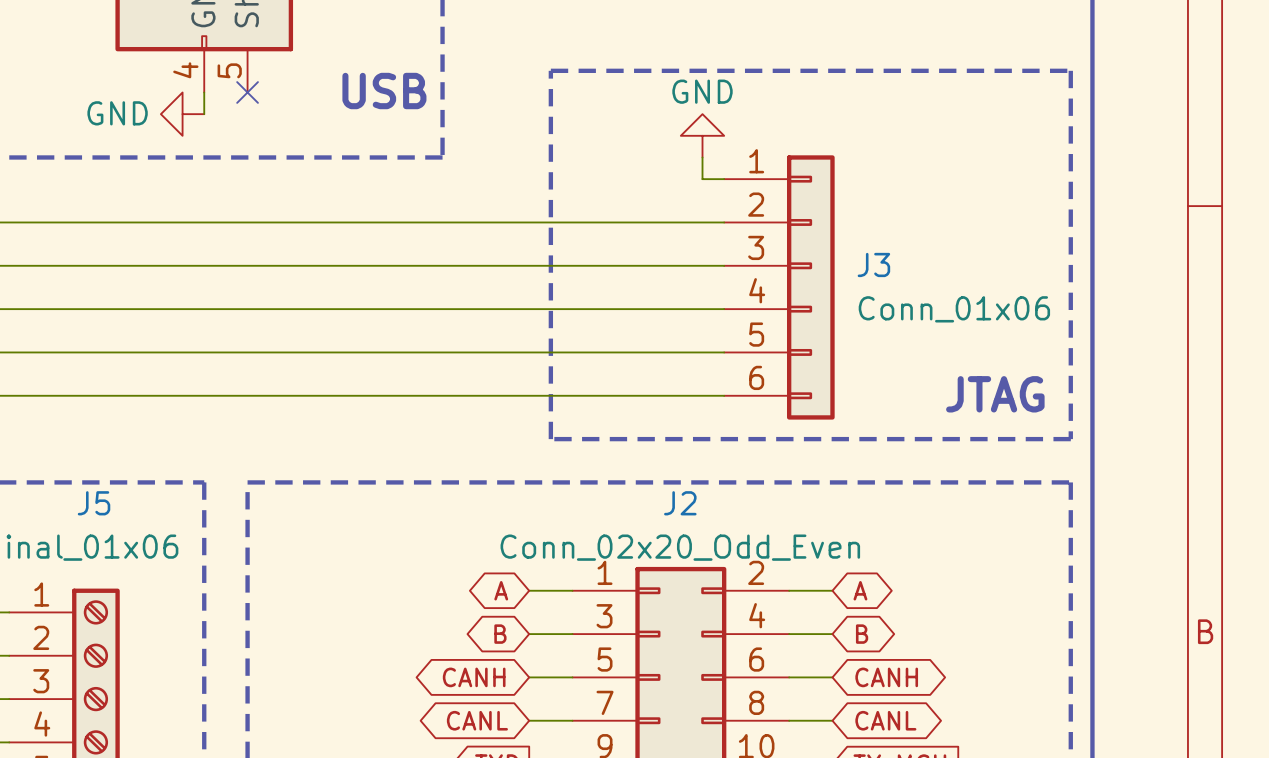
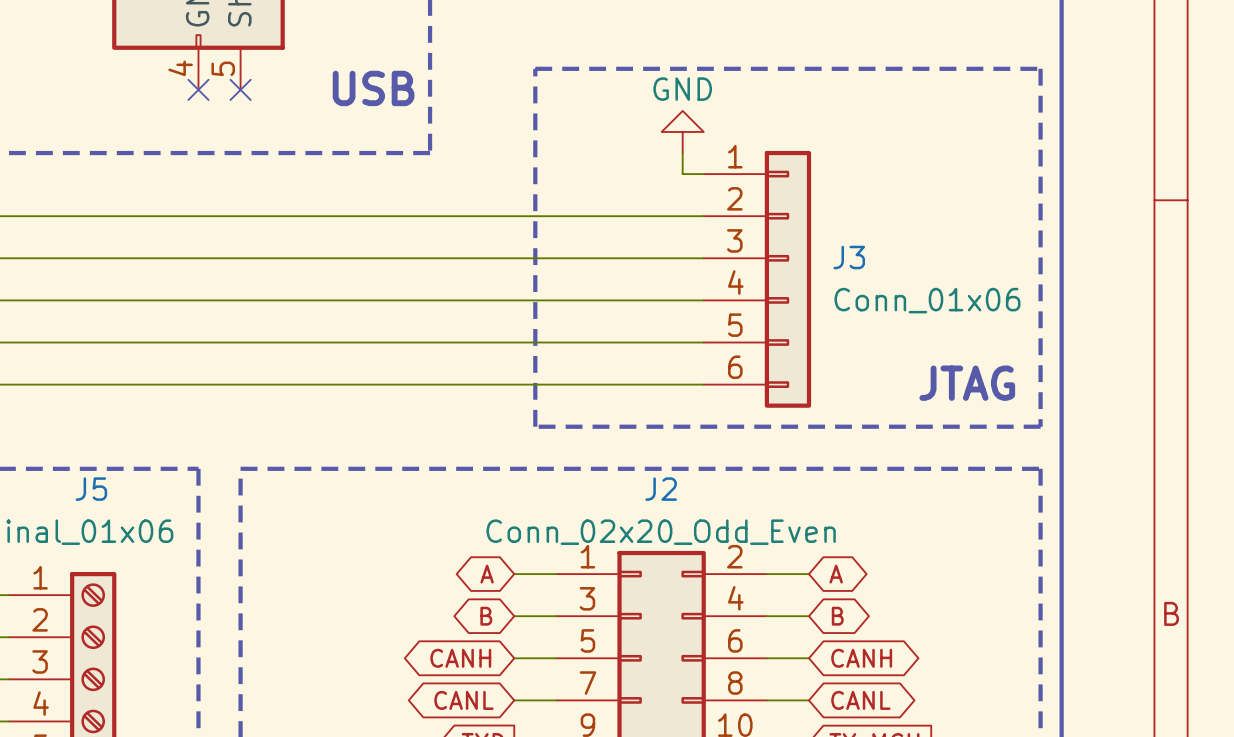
wire: (204, 92) (204, 114) -> none
no-connect mark: none -> (198, 89)
power symbol: GND (182, 114) -> none

